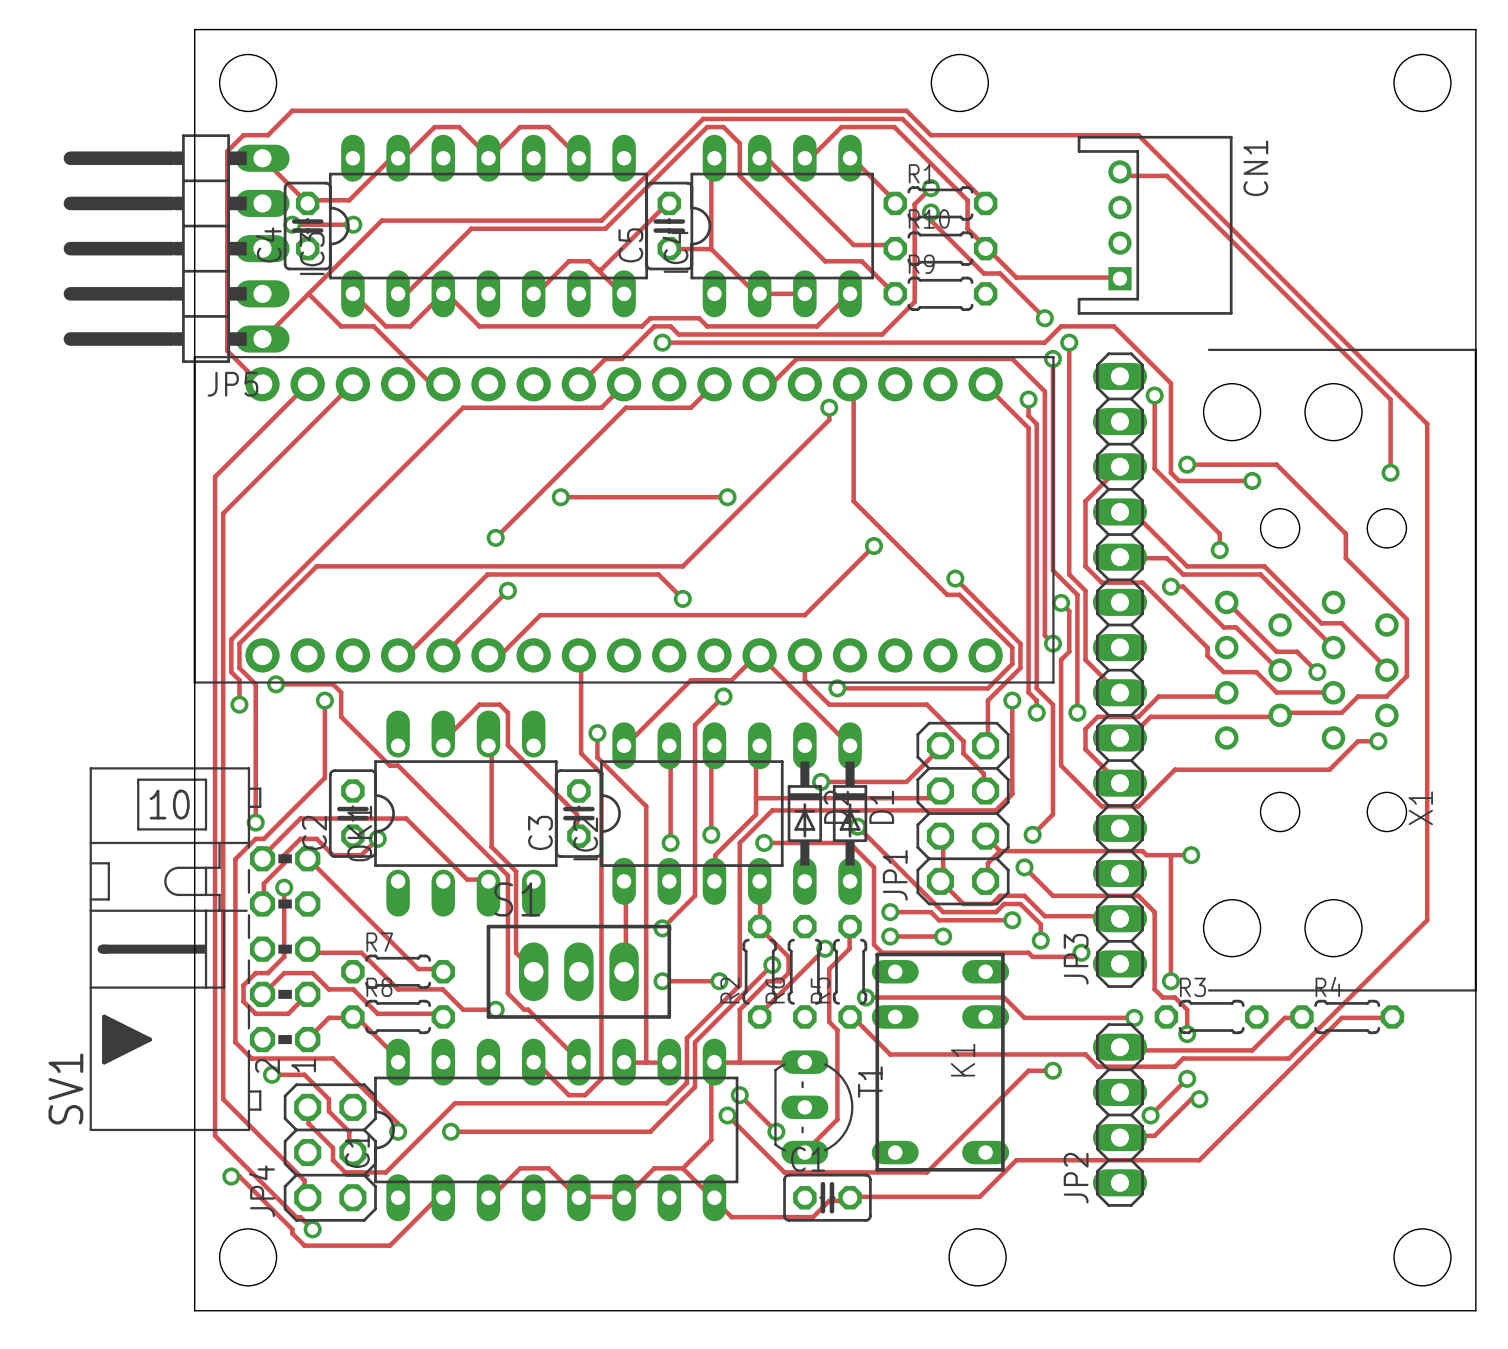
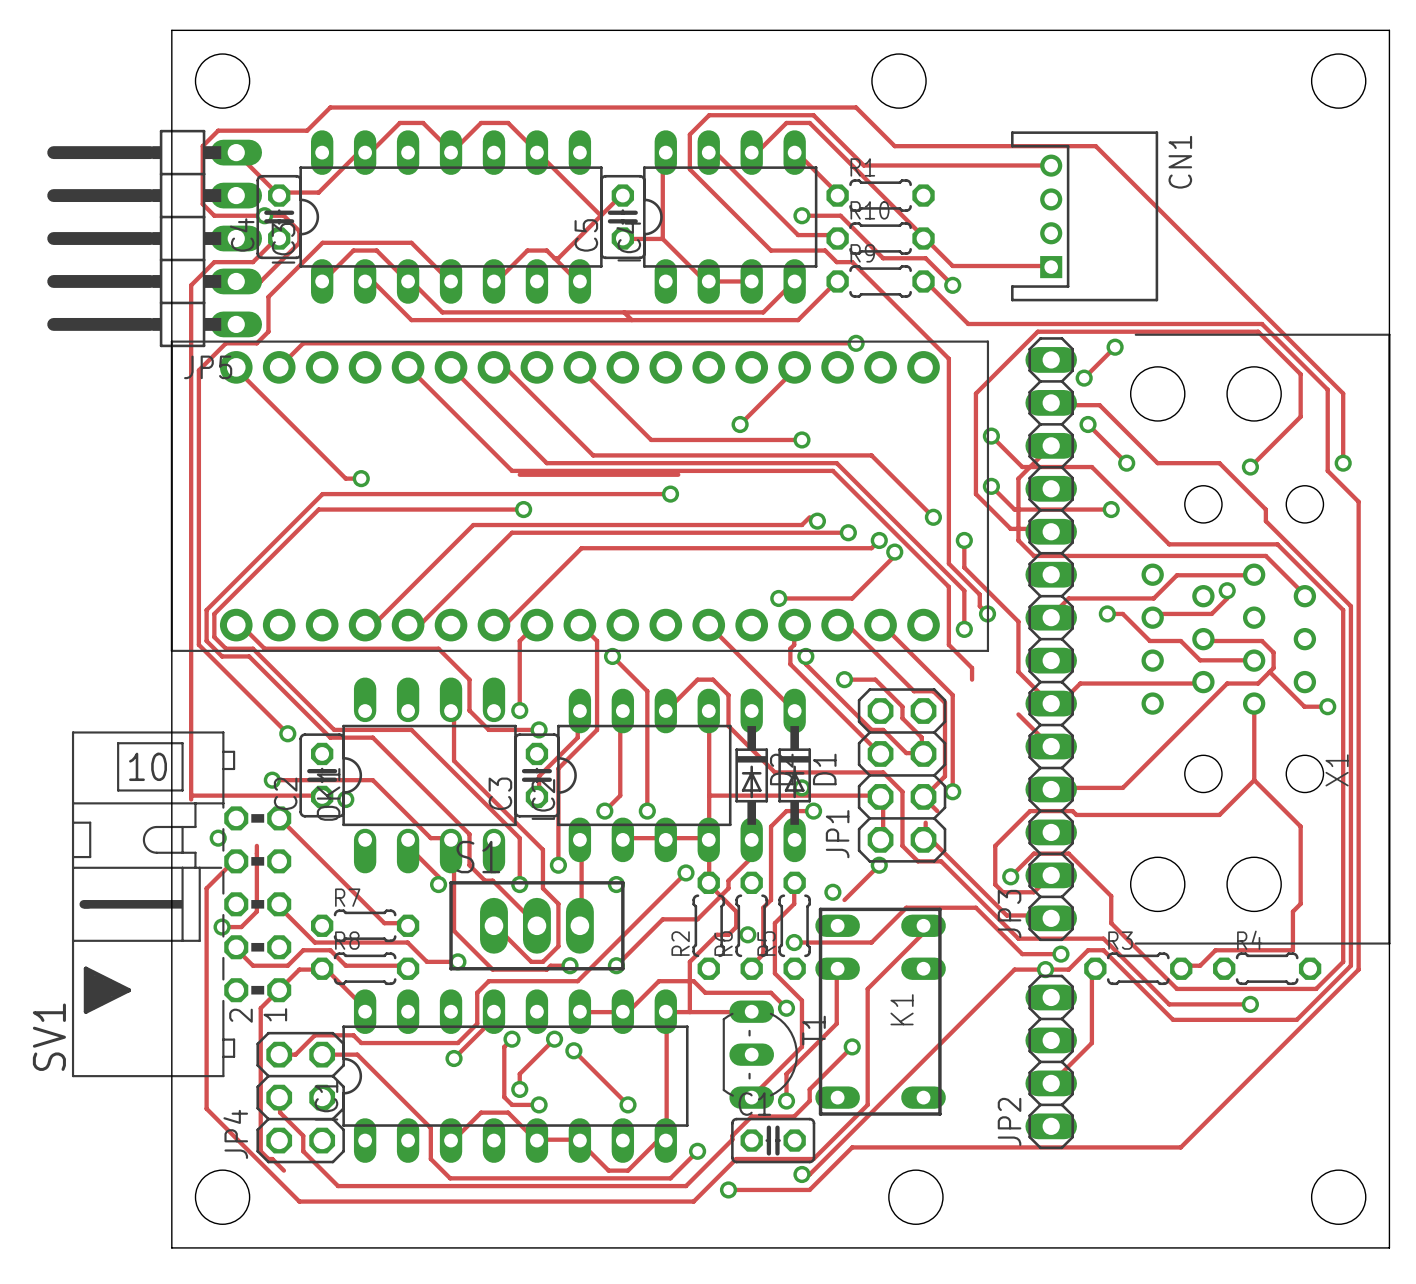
track: (361, 110) (292, 110) (267, 135) -> (330, 107) (307, 130) (241, 130)
track: (906, 110) (930, 135) (1138, 135) (1341, 338) -> (848, 107) (856, 107) (894, 146) (1095, 146) (1343, 393) (1343, 405)
track: (760, 118) (703, 118) (601, 220) (381, 220) (262, 339) -> (709, 115) (689, 134) (689, 138)
track: (869, 118) (902, 118) (985, 203) -> (813, 115) (863, 165) (1051, 165)
track: (865, 127) (894, 127) (967, 200) (967, 228) -> (809, 122) (906, 219)
track: (739, 143) (723, 127) (707, 127) (605, 228) (471, 228) (406, 293) -> (631, 320) (411, 320) (372, 281)
track: none -> (536, 152) (600, 215)
track: (1119, 171) (1122, 175) (1166, 175) (1337, 346) -> none
track: (930, 188) (914, 204) (914, 301) (882, 334) (853, 334) -> none
via: (930, 188) -> none
track: (227, 212) (227, 350) (262, 384) -> (202, 204) (214, 215) (264, 215)
track: (930, 212) (930, 220) (983, 273) (1000, 273) (1044, 318) -> none
via: (930, 212) -> none
track: (312, 224) (353, 224) -> (283, 215) (299, 231) (299, 242) (260, 281) (236, 281)
via: (353, 224) -> none
track: none -> (801, 215) (840, 215) (883, 258) (925, 258) (952, 285)
via: none -> (801, 215)
track: (861, 261) (894, 293) -> (798, 320) (836, 281)
track: (308, 293) (341, 326) (373, 326) (430, 383) (443, 384) -> (948, 617) (948, 586) (832, 470) (512, 470) (408, 367)
track: (353, 293) (385, 326) (410, 326) (442, 293) -> (322, 281) (353, 250) (376, 250) (407, 281)
track: none -> (923, 281) (968, 323) (1262, 323)
via: none -> (952, 285)
via: (1044, 318) -> none
track: (642, 326) (650, 318) (699, 318) (707, 326) -> (624, 312) (658, 312)
track: (654, 326) (621, 358) -> (608, 312) (597, 312)
track: (662, 342) (1044, 342) (1061, 326) (1113, 326) (1170, 383) (1170, 472) (1179, 480) (1252, 480) -> none
via: (662, 342) -> none
track: (1069, 342) (1069, 574) (1085, 590) (1085, 651) -> none
via: (1069, 342) -> none
track: (605, 358) (578, 384) -> (562, 343) (303, 343) (279, 367)
track: (796, 358) (772, 383) (759, 384) -> (743, 343) (577, 343)
track: (914, 358) (1012, 358) (1044, 391) (1044, 623) -> (805, 250) (825, 250) (836, 262) (852, 262) (948, 358) (948, 563) (979, 594)
via: none -> (856, 343)
track: (1052, 358) (1052, 570) (1077, 594) (1077, 712) -> none
via: (1052, 358) -> none
track: none -> (1115, 347) (1080, 381)
via: none -> (1115, 347)
track: none -> (236, 367) (345, 478) (361, 478)
track: (307, 384) (215, 476) -> (279, 238) (276, 238) (253, 262) (214, 262) (191, 285) (191, 455)
track: (352, 384) (223, 513) -> (451, 281) (411, 242) (322, 242) (268, 296) (268, 331) (256, 343) (225, 343) (198, 370) (198, 490)
track: none -> (451, 367) (546, 463) (836, 463) (964, 590)
track: none -> (493, 367) (496, 370) (508, 370) (593, 455) (871, 455) (933, 517)
track: (624, 384) (601, 407) (463, 407) (353, 517) -> (670, 494) (322, 494)
track: none -> (579, 367) (651, 439) (801, 439)
track: (714, 384) (690, 407) (625, 407) (495, 537) -> none
track: (850, 384) (853, 387) (853, 501) (947, 594) (959, 594) (1012, 647) -> (794, 367) (794, 370) (740, 424)
track: (985, 384) (1028, 428) (1028, 566) -> none
track: (1382, 391) (1390, 399) (1390, 472) -> (1300, 374) (1300, 416) (1250, 467)
track: (1154, 395) (1154, 468) (1219, 533) (1219, 550) -> none
track: (1028, 399) (1028, 415) (1036, 424) (1036, 688) (1052, 704) (1052, 814) (1032, 834) -> none
via: (1028, 399) -> none
track: (829, 407) (829, 419) (682, 566) (316, 566) -> (523, 509) (318, 509) (287, 540)
via: (829, 407) -> none
track: (1410, 407) (1427, 424) -> (1327, 389) (1327, 470) (1358, 501) (1358, 969) (1180, 1147) (852, 1147) (809, 1189) (728, 1189)
via: none -> (740, 424)
track: none -> (1088, 424) (1126, 463)
via: none -> (1088, 424)
via: none -> (991, 436)
via: none -> (801, 439)
track: (1187, 464) (1276, 464) (1297, 485) -> (1051, 402) (1053, 405) (1099, 405) (1157, 463) (1219, 463)
via: (1187, 464) -> none
via: (1390, 472) -> none
via: (1252, 480) -> none
via: none -> (1126, 463)
track: (1427, 485) (1427, 639) -> none
via: none -> (1343, 463)
via: none -> (1250, 467)
via: (560, 497) -> none
via position: (727, 497) -> (670, 494)
via: none -> (361, 478)
track: none -> (991, 486) (1014, 509) (1111, 509)
via: none -> (991, 486)
track: (1119, 511) (1134, 513) (1187, 566) (1264, 566) (1321, 623) (1341, 623) (1386, 670) -> none
via: none -> (523, 509)
via: none -> (1111, 509)
via: (495, 537) -> none
track: none -> (809, 517) (801, 525) (473, 525) (450, 548)
via: none -> (933, 517)
track: (874, 546) (804, 615) (540, 615) (503, 651) (491, 651) (488, 655) -> none
track: (1345, 546) (1345, 558) (1358, 570) -> (991, 436) (1022, 467) (1091, 467) (1169, 544) (1277, 544)
via: (1219, 550) -> none
track: (1119, 557) (1166, 558) (1183, 574) (1260, 574) (1333, 647) -> (1051, 531) (1049, 528) (1010, 528) (975, 494) (975, 393) (1037, 331) (1258, 331)
via: none -> (848, 532)
via: none -> (879, 540)
via: none -> (964, 540)
track: (487, 574) (625, 574) -> (493, 625) (496, 621) (508, 621) (581, 548)
track: (658, 574) (682, 598) -> (612, 548) (871, 548) (879, 540)
track: (955, 578) (1020, 643) (1020, 668) (987, 700) (987, 745) (985, 745) -> none
track: none -> (894, 555) (852, 598) (778, 598)
track: (1142, 582) (1207, 647) (1207, 655) -> (1107, 613) (1122, 613) (1134, 625)
track: none -> (1072, 555) (1265, 555) (1304, 596)
track: (1170, 586) (1183, 586) (1223, 627) -> (1051, 617) (1068, 598) (1149, 598)
via: (1170, 586) -> none
track: (507, 590) (446, 651) -> (848, 532) (512, 532) (423, 621) (411, 621)
via: (507, 590) -> none
track: (1028, 594) (1028, 619) -> (964, 567) (1018, 621)
via: (682, 598) -> none
track: (1061, 602) (1069, 611) (1069, 651) (1061, 659) (1061, 765) (1101, 806) (1138, 806) (1175, 769) (1329, 769) (1358, 741) (1378, 741) -> none
via: (1061, 602) -> none
track: (1226, 602) (1276, 651) (1297, 651) (1317, 672) -> none
track: none -> (1227, 590) (1227, 598) (1211, 613) (1153, 613) (1152, 617)
track: (1406, 619) (1406, 676) (1386, 696) (1358, 696) (1353, 700) -> (1323, 590) (1343, 610)
via: none -> (778, 598)
track: (1227, 627) (1236, 627) (1280, 670) -> (1153, 598) (1176, 575) (1254, 574)
via: none -> (1107, 613)
track: (578, 655) (581, 655) (581, 753) (601, 773) (601, 806) -> (579, 625) (597, 640) (597, 729) (558, 768)
track: none -> (536, 625) (519, 640) (519, 710)
track: (759, 655) (756, 655) (731, 680) (690, 680) (624, 745) -> (536, 796) (539, 795) (539, 776) (577, 737) (577, 714) (579, 711)
track: (804, 655) (804, 680) (829, 704) (926, 704) (935, 712) -> (844, 679) (875, 679)
track: none -> (837, 625) (848, 625) (914, 691) (933, 691) (945, 702) (945, 776) (923, 796)
track: none -> (880, 625) (952, 695) (952, 791)
track: (1028, 659) (1028, 692) -> (948, 633) (948, 644) (964, 660)
via: none -> (964, 629)
track: (1085, 659) (1119, 692) -> (1018, 629) (1018, 671) (1051, 703)
track: (1012, 663) (987, 688) (837, 688) -> none
track: none -> (1203, 639) (1204, 640) (1262, 640) (1273, 652) (1273, 668)
via position: (1317, 672) -> (1227, 590)
track: (223, 676) (223, 1099) (304, 1180) (304, 1196) (307, 1197) -> (198, 644) (287, 733)
track: (239, 680) (239, 704) -> none
track: (251, 680) (255, 684) (255, 822) -> none
track: (276, 684) (333, 684) (341, 692) (341, 716) (389, 765) -> (225, 648) (253, 648) (334, 729) (357, 729)
via: (276, 684) -> none
via: none -> (612, 656)
via position: (837, 688) -> (805, 656)
track: none -> (805, 656) (805, 664) (871, 729) (883, 729) (906, 753) (921, 753)
track: (1226, 692) (1223, 696) (1158, 696) (1138, 716) (1097, 716) (1085, 729) (1085, 749) -> none
track: (723, 696) (695, 725) -> (612, 656) (647, 691)
via: (723, 696) -> none
track: (324, 700) (324, 777) (263, 838) (255, 838) (235, 859) (235, 1042) (251, 1058) (333, 1058) (398, 1123) (398, 1131) -> none
via: (324, 700) -> none
track: (1012, 700) (1012, 794) (996, 810) (943, 810) -> none
via: (1012, 700) -> none
via: (239, 704) -> none
track: (499, 704) (479, 704) (446, 737) (446, 745) (443, 745) -> (461, 671) (438, 648) (264, 648) (237, 621) (236, 625)
track: none -> (1269, 671) (1304, 706) (1327, 706)
via: none -> (844, 679)
via: (1036, 712) -> none
via: (1077, 712) -> none
track: (1341, 712) (1280, 712) (1280, 715) -> (1262, 679) (1258, 683) (1227, 683) (1122, 787) (1053, 787) (1051, 789)
track: (597, 733) (597, 757) (646, 806) (646, 1062) -> none
via: (597, 733) -> none
track: none -> (1254, 703) (1254, 780)
via position: (1378, 741) -> (1327, 706)
via: none -> (519, 710)
track: (669, 745) (670, 842) -> (622, 711) (620, 714) (620, 795) (604, 811)
track: (714, 745) (711, 749) (711, 834) -> (665, 711) (697, 679) (713, 679) (728, 695) (728, 726) (774, 772)
track: (759, 745) (756, 749) (756, 814) (715, 855) (715, 879) -> (708, 711) (708, 839) (705, 838) (666, 838)
track: (940, 745) (906, 781) (821, 781) -> none
track: (398, 765) (406, 773) -> (214, 648) (222, 656) (249, 656) (330, 737) (372, 737)
track: none -> (365, 729) (411, 729) (519, 838) (519, 884)
track: (528, 765) (577, 814) (577, 834) (578, 836) -> (488, 729) (539, 729)
via: none -> (539, 729)
via: none -> (287, 733)
via: (821, 781) -> none
track: (940, 790) (935, 798) (756, 798) -> (880, 753) (790, 664) (790, 648) (794, 644) (794, 625)
track: (491, 798) (491, 847) (516, 871) (516, 952) (533, 971) -> (454, 760) (542, 849) (542, 888) (558, 903)
track: (829, 810) (772, 810) (739, 842) (739, 985) (686, 1038) (686, 1082) (666, 1103) (455, 1103) (385, 1172) (345, 1172) (333, 1160) (333, 1148) (308, 1123) (308, 1107) -> (685, 872) (577, 981) (488, 981) (477, 992) (477, 1023) (457, 1043) (361, 1043) (353, 1035) (314, 1035) (295, 1054) (280, 1054)
track: (300, 818) (262, 858) -> none
via: none -> (272, 780)
track: none -> (1254, 780) (1300, 826) (1300, 903) (1292, 911) (1292, 950) (1215, 950) (1200, 965) (1184, 965) (1181, 968)
track: none -> (1254, 780) (1219, 814) (1118, 814)
via: (255, 822) -> none
track: (857, 826) (943, 912) (996, 912) (1004, 903) (1020, 903) (1040, 924) (1040, 940) -> none
track: none -> (191, 795) (322, 796)
via: (711, 834) -> none
track: none -> (709, 795) (880, 796)
via position: (1032, 834) -> (952, 791)
track: (215, 838) (215, 1135) (288, 1209) -> (279, 990) (260, 1008) (260, 1151)
track: (377, 838) (361, 855) (333, 855) (316, 838) (300, 838) (284, 855) (284, 863) (263, 883) (262, 903) -> none
via: (670, 842) -> none
track: (764, 842) (849, 842) (874, 867) (874, 944) (882, 952) (967, 952) -> (794, 942) (871, 942) (906, 907)
via: (764, 842) -> none
via: none -> (604, 811)
track: (695, 851) (695, 895) (662, 928) -> none
via: none -> (647, 811)
track: none -> (813, 811) (786, 811) (771, 826) (771, 900) (763, 907) (763, 954) (751, 965) (751, 968)
via: none -> (813, 811)
track: (1097, 851) (1000, 851) (987, 863) -> none
track: (1170, 855) (1170, 981) -> none
via: (1191, 855) -> none
track: (1024, 867) (1052, 895) (1101, 895) -> (1010, 876) (1033, 853)
via: (1024, 867) -> none
via: none -> (218, 838)
track: none -> (408, 839) (411, 842) (411, 849) (438, 876) (438, 884)
track: none -> (622, 839) (624, 838) (662, 838) (665, 839)
track: none -> (751, 839) (751, 857) (728, 880) (728, 888) (697, 919) (662, 919) (616, 965)
track: (940, 881) (963, 903) (979, 903) -> (883, 772) (902, 791) (902, 845) (917, 861)
track: none -> (923, 839) (925, 834) (1006, 915) (1049, 915) (1051, 918)
via: (284, 887) -> none
track: (991, 903) (1000, 895) (1024, 895) (1044, 916) (1118, 916) (1119, 918) -> (1030, 811) (995, 845) (995, 884) (1002, 892) (1033, 892) (1051, 875)
track: none -> (929, 861) (941, 861) (1018, 938) (1103, 938) (1169, 1004) (1250, 1004)
track: (507, 908) (507, 993) -> (451, 839) (454, 842) (454, 930) (469, 946)
track: none -> (469, 865) (484, 880) (492, 880) (536, 925)
track: (601, 908) (601, 948) -> none
via: none -> (558, 865)
via: none -> (879, 865)
track: (890, 912) (930, 912) (939, 920) (1012, 920) -> none
via: (890, 912) -> none
track: (1154, 912) (1154, 989) (1162, 997) -> (1064, 969) (1068, 969) (1088, 950) (1091, 950)
via: none -> (685, 872)
via: (1012, 920) -> none
via: none -> (1010, 876)
track: (1427, 920) (1288, 1058) (1183, 1058) (1175, 1066) (1097, 1066) (1085, 1054) (890, 1054) (853, 1017) (850, 1016) -> (1343, 876) (1343, 961) (1316, 988) (1176, 988) (1111, 923) (1111, 896) (1084, 869)
via: none -> (438, 884)
via: none -> (519, 884)
track: (890, 936) (943, 936) -> none
via: (943, 936) -> none
via: (1040, 940) -> none
track: (825, 948) (760, 1013) (759, 1016) -> none
via: (825, 948) -> none
track: (308, 952) (361, 952) (398, 989) -> (280, 907) (314, 942)
track: (1028, 952) (1032, 956) (1077, 956) (1081, 952) -> (964, 907) (975, 907) (1022, 954) (1060, 954)
via: (1081, 952) -> none
track: (772, 964) (707, 1030) -> (786, 1008) (771, 992) (705, 992) (693, 981) (658, 981)
via: (772, 964) -> none
via: none -> (222, 927)
track: (255, 973) (243, 985) (243, 1001) (255, 1013) (280, 1013) -> (236, 947) (253, 965)
track: (662, 981) (719, 981) -> none
via: (662, 981) -> none
via: (719, 981) -> none
via: none -> (747, 934)
via: (1170, 981) -> none
track: (345, 989) (328, 989) (312, 973) (284, 973) (262, 994) -> none
track: (353, 989) (361, 997) -> (322, 942) (365, 942)
track: (601, 993) (601, 1078) (585, 1095) (568, 1095) (536, 1062) (533, 1062) -> (558, 946) (542, 961) (531, 961) (493, 925)
track: (307, 994) (288, 1013) -> (330, 950) (303, 950) (287, 965) (260, 965)
track: (865, 997) (1004, 997) (1024, 1017) (1081, 1017) -> none
via position: (865, 997) -> (794, 942)
track: (524, 1009) (528, 1009) (578, 1062) -> (484, 961) (492, 969) (546, 969) (550, 965) (570, 965)
track: (1187, 1009) (1187, 1034) -> (1115, 961) (1173, 1019) (1296, 1019) (1350, 965) (1350, 606) (1265, 521)
via: none -> (570, 965)
via: none -> (616, 965)
track: none -> (837, 968) (836, 1023) (786, 1073) (786, 1101)
track: (1302, 1016) (1284, 1017) (1252, 1050) (1122, 1050) (1119, 1047) -> none
track: (1392, 1016) (1341, 1017) (1199, 1160) (1016, 1160) (979, 1196) (853, 1196) (850, 1197) (849, 1200) (829, 1200) (812, 1217) -> (923, 925) (921, 934) (867, 988) (867, 1104) (813, 1159) (759, 1159)
via: none -> (1045, 969)
via position: (1134, 1017) -> (1060, 954)
track: (837, 1030) (837, 1119) -> (782, 981) (801, 1000) (801, 1046) (782, 1066)
via: (1187, 1034) -> none
track: (695, 1042) (695, 1087) (650, 1131) (450, 1131) -> (647, 992) (631, 1008) (624, 1008) (622, 1011)
via: none -> (1250, 1004)
via: none -> (786, 1008)
track: none -> (493, 1011) (492, 1019) (454, 1058)
track: (714, 1062) (711, 1062) (711, 1139) (682, 1168) -> none
track: (1028, 1070) (1052, 1070) -> (964, 1019) (1014, 969)
via: (1052, 1070) -> none
track: (272, 1074) (304, 1074) (328, 1099) (328, 1111) (349, 1131) (349, 1152) (352, 1152) -> none
via: (272, 1074) -> none
track: (1187, 1078) (1150, 1115) -> (879, 865) (844, 900)
via: (1187, 1078) -> none
track: none -> (512, 1039) (504, 1046) (504, 1097) (512, 1104) (539, 1104)
via: none -> (512, 1039)
track: none -> (554, 1039) (519, 1073) (519, 1089)
via: none -> (554, 1039)
track: (739, 1095) (776, 1131) -> none
via: (739, 1095) -> none
track: none -> (852, 1046) (809, 1089) (809, 1101) (794, 1116)
via: none -> (852, 1046)
track: (1199, 1099) (1191, 1099) (1154, 1135) (1122, 1135) -> (1095, 968) (1091, 969) (1091, 1043) (1053, 1081)
via: (1199, 1099) -> none
track: none -> (573, 1050) (628, 1104)
via: none -> (573, 1050)
track: none -> (322, 1054) (357, 1054) (430, 1128) (430, 1159) (450, 1178) (670, 1178) (697, 1151)
track: (727, 1115) (784, 1172) (804, 1172) -> (357, 1186) (685, 1186) (732, 1139) (732, 1135) (751, 1116)
via: (727, 1115) -> none
via: (1150, 1115) -> none
via: (398, 1131) -> none
via position: (450, 1131) -> (454, 1058)
via: (776, 1131) -> none
via: none -> (519, 1089)
via: none -> (786, 1101)
via: none -> (539, 1104)
via: none -> (628, 1104)
track: (682, 1168) (654, 1168) (624, 1197) -> (666, 1012) (666, 1139) (662, 1143) (655, 1143) (628, 1170) (608, 1170) (579, 1140)
track: (682, 1168) (714, 1197) (731, 1217) (788, 1217) -> (236, 861) (233, 861) (206, 888) (206, 1108) (299, 1201) (693, 1201) (736, 1159)
track: (849, 1172) (926, 1172) -> (801, 1174) (809, 1174) (867, 1116)
track: (231, 1176) (239, 1176) (292, 1229) (292, 1233) (304, 1245) (369, 1245) -> (279, 1097) (280, 1112) (303, 1135) (303, 1151) (338, 1186)
via: (231, 1176) -> none
track: (443, 1197) (442, 1200) (434, 1200) (389, 1245) -> none
via: none -> (697, 1151)
via: (312, 1229) -> none
via: none -> (801, 1174)
via: none -> (728, 1189)

